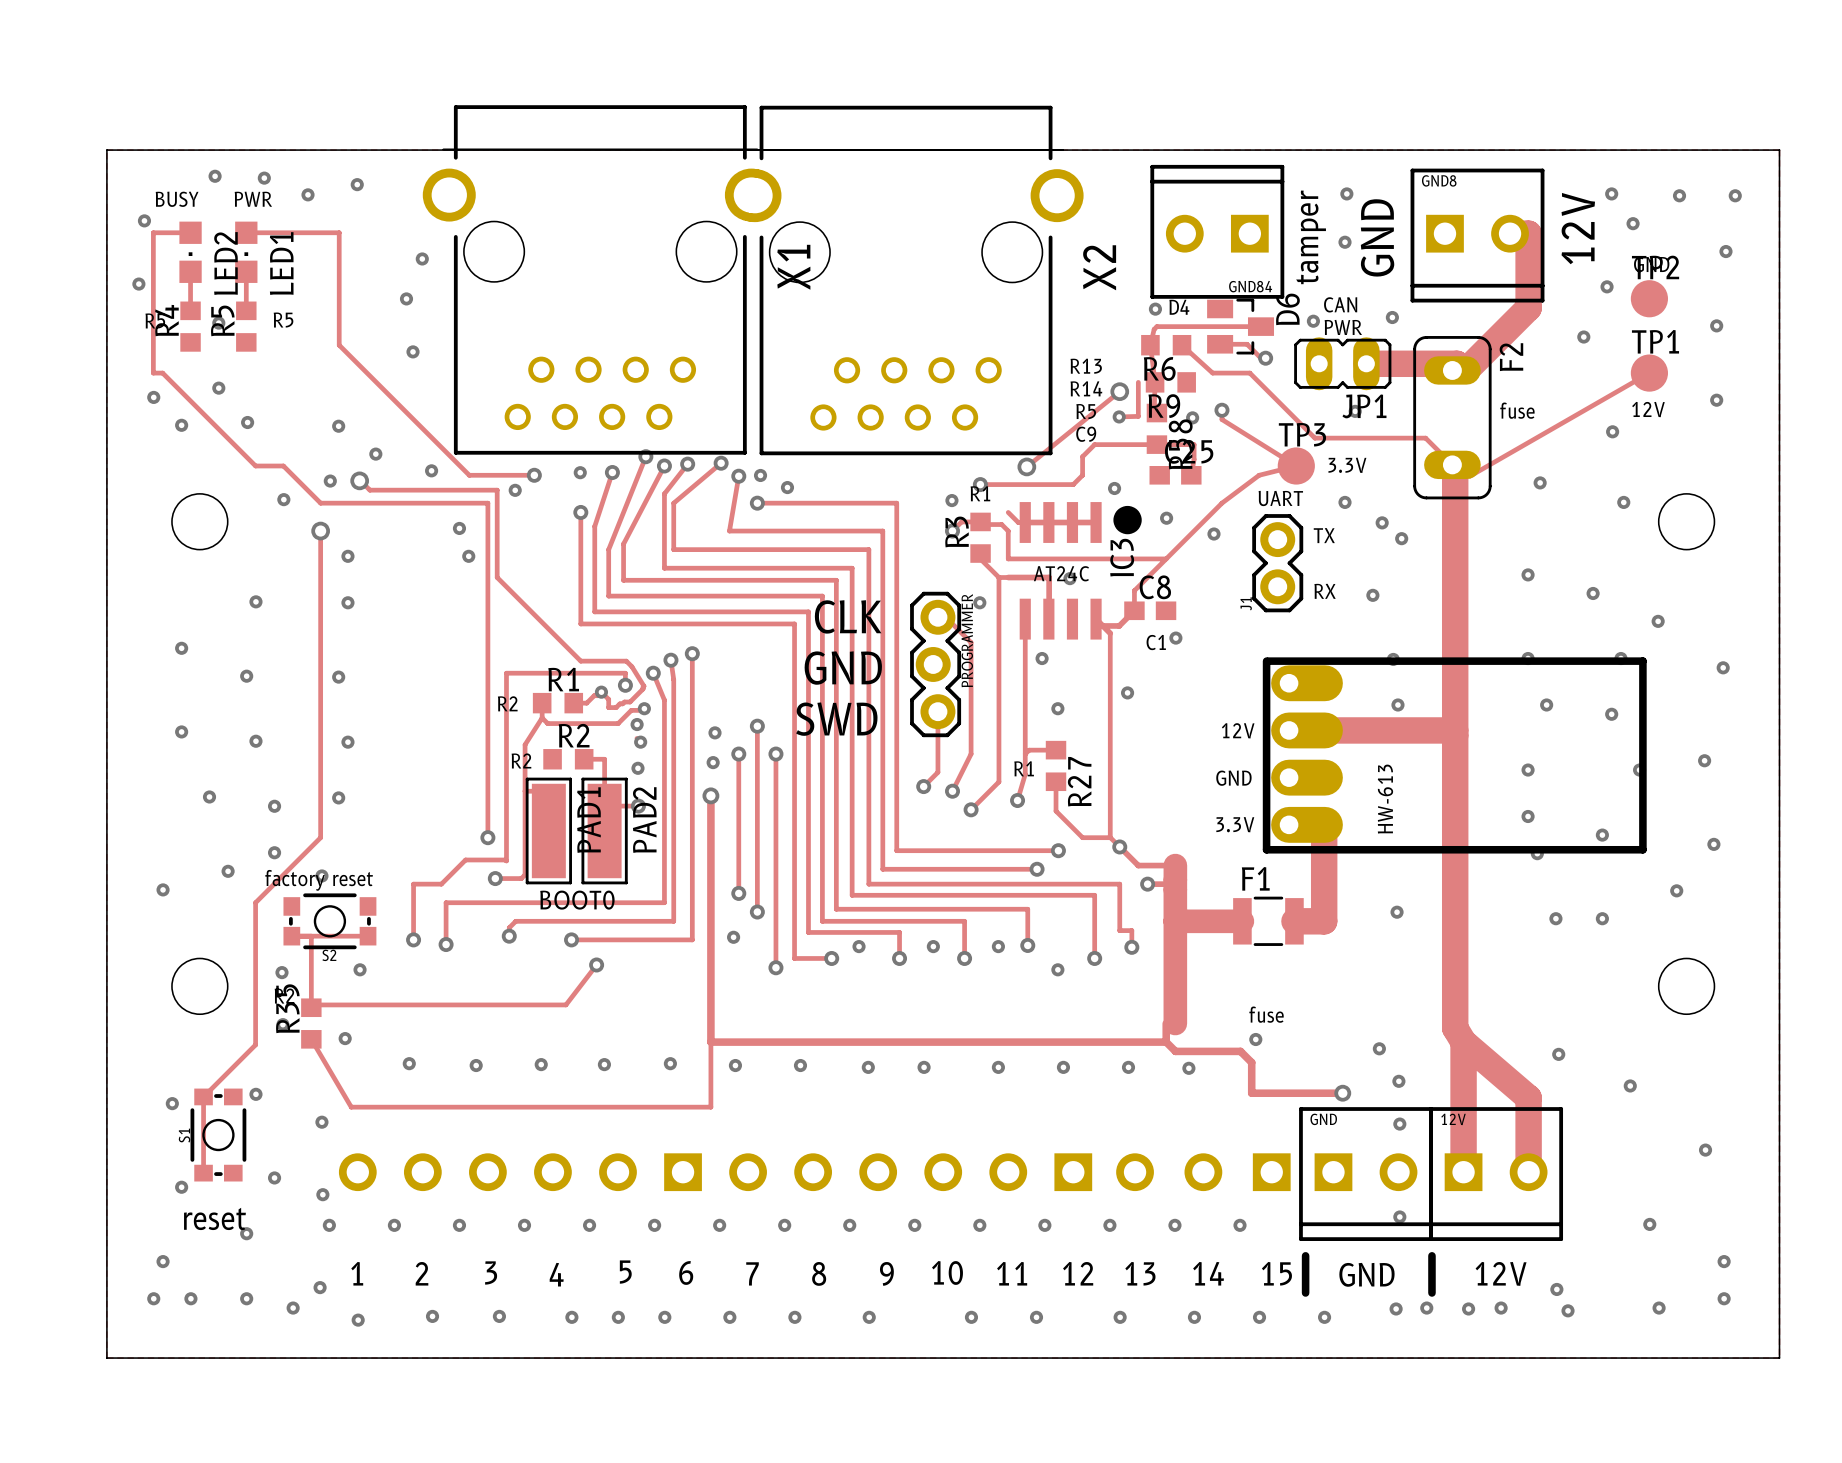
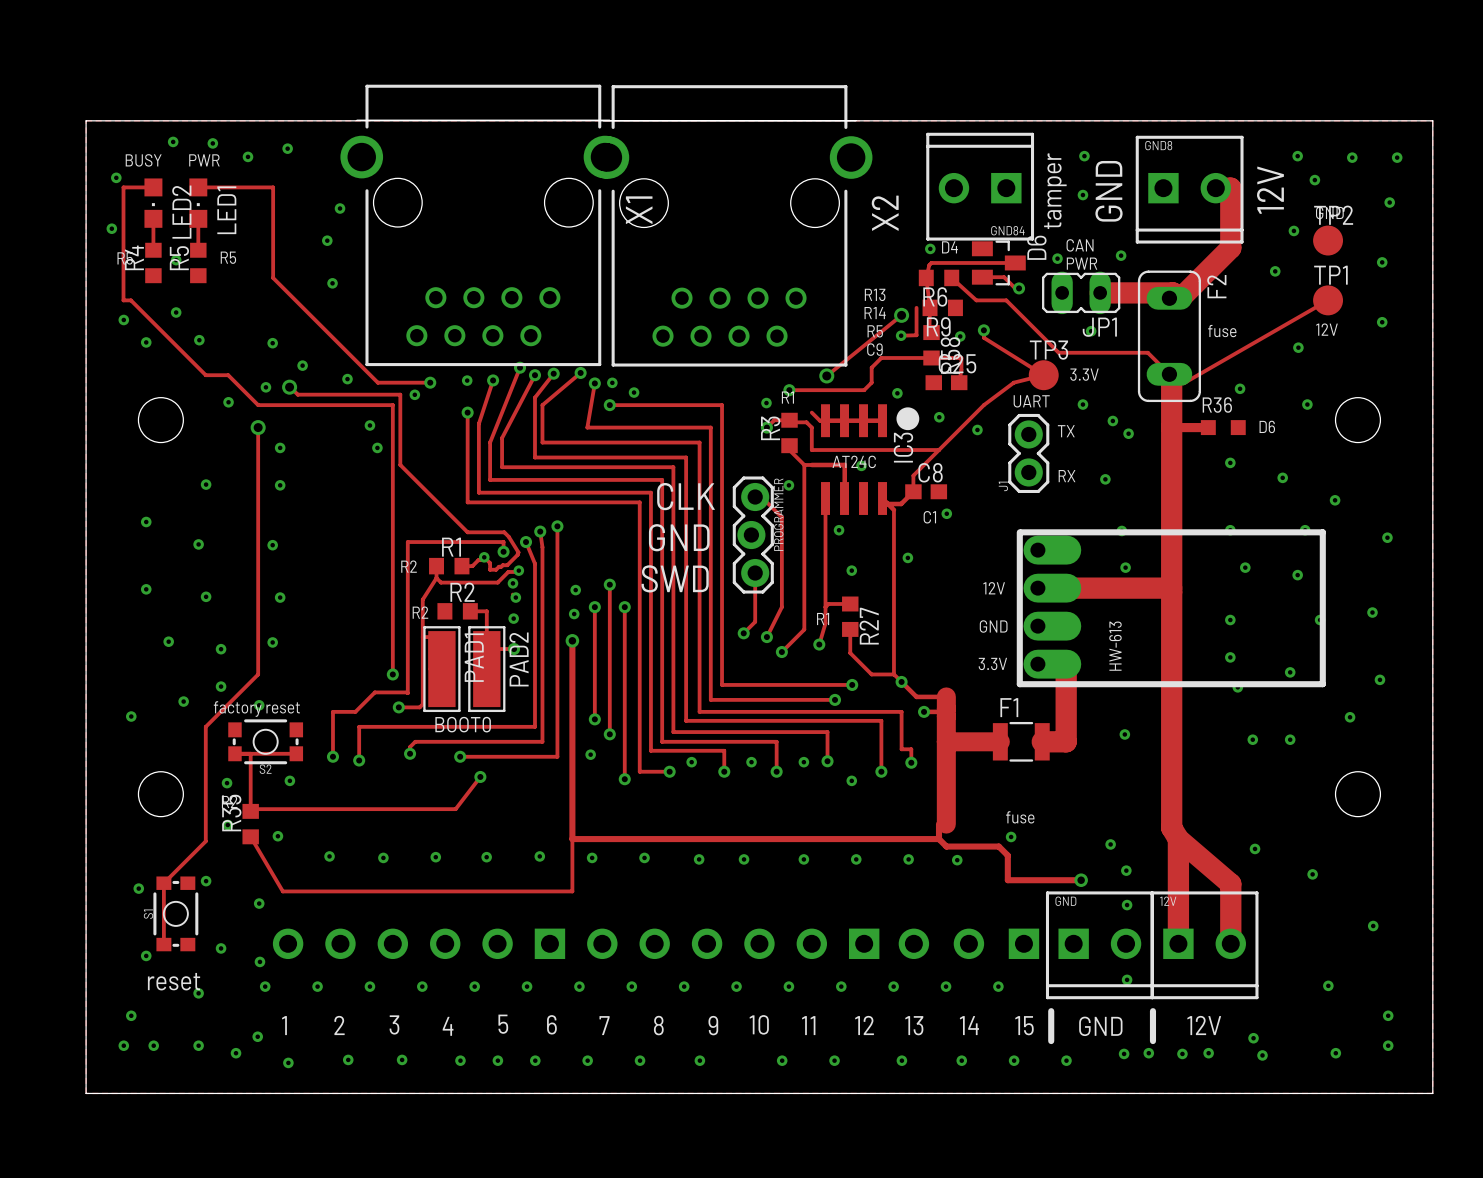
text: none -> D6 (1267, 426)
track: none -> (1171, 427) (1208, 427)
R36: none -> (1223, 427)

